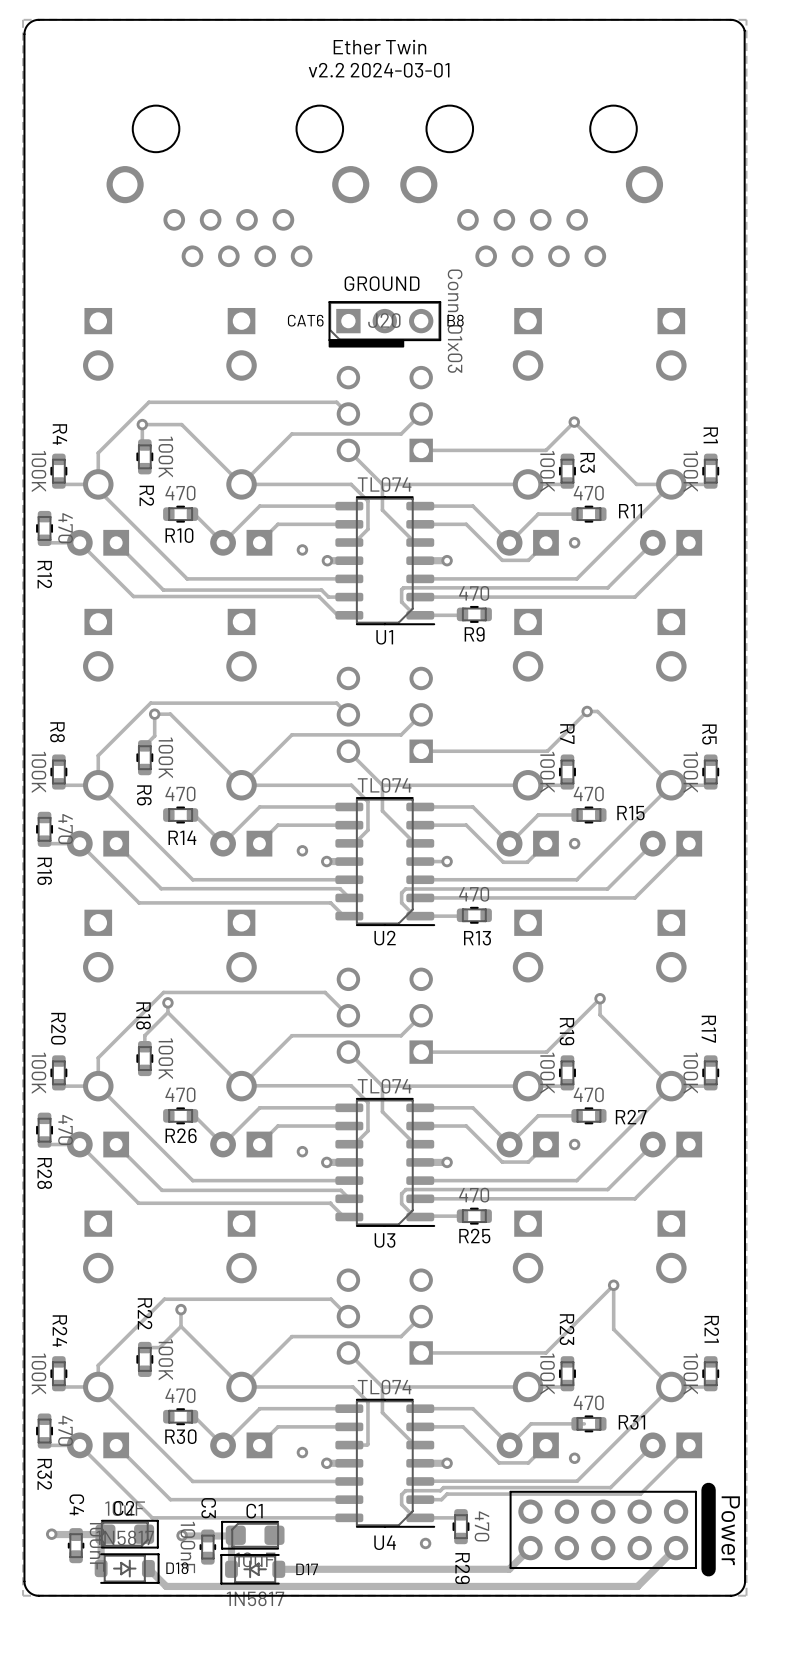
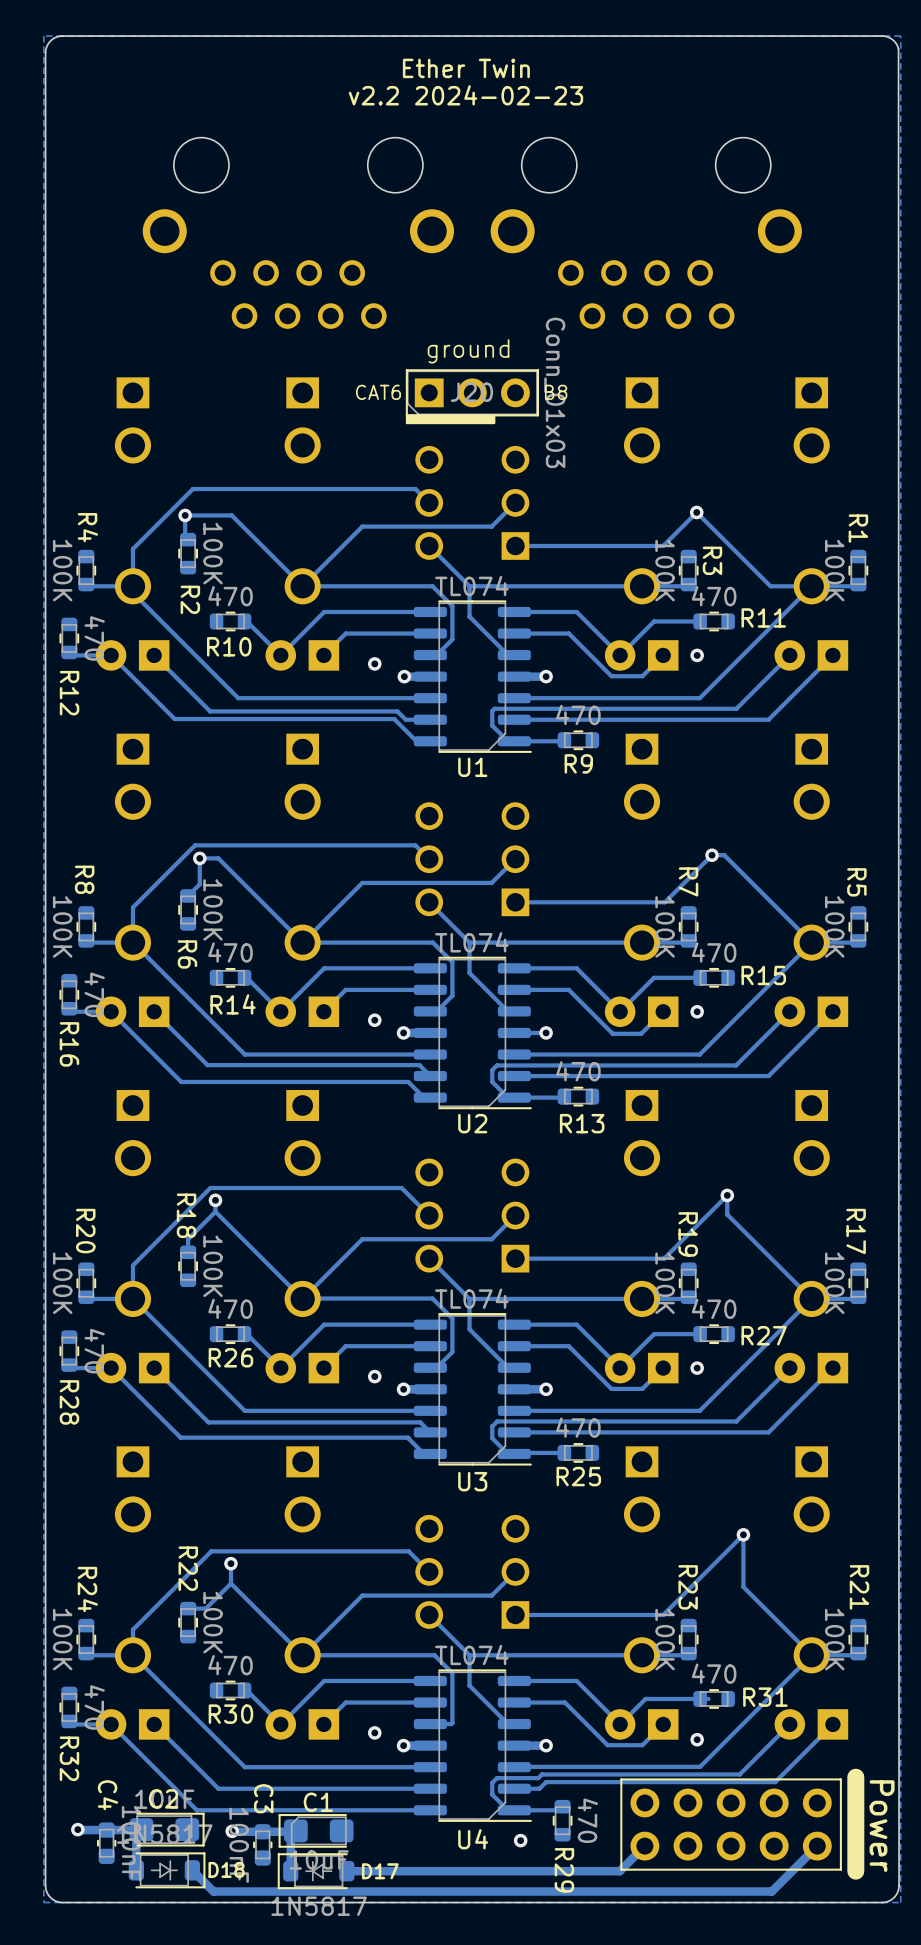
text: v2.2 2024-03-01 (379, 70) -> v2.2 2024-02-23 (465, 95)
text: GROUND (382, 283) -> ground (468, 351)

